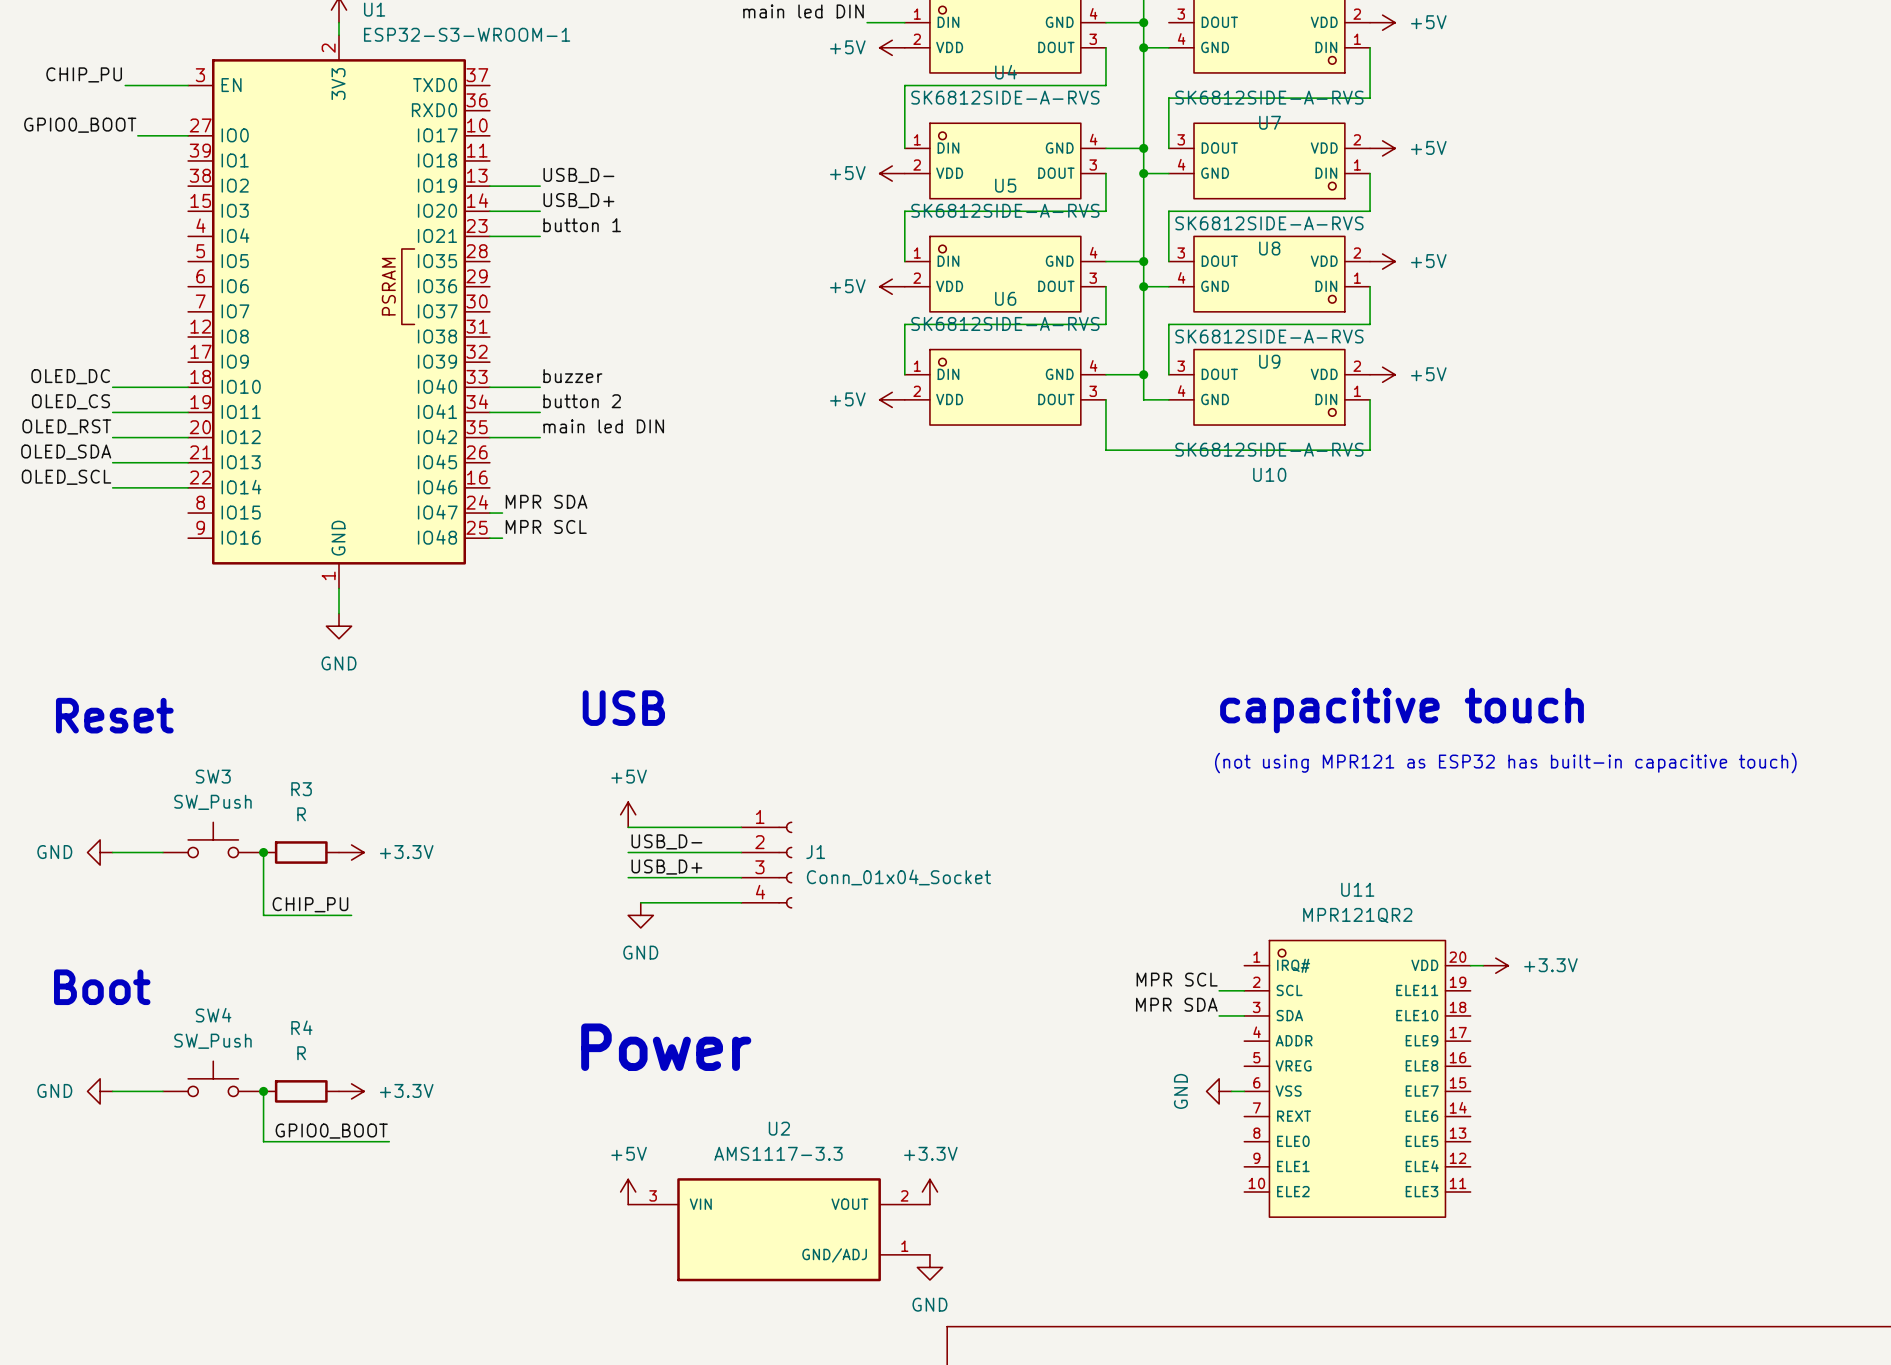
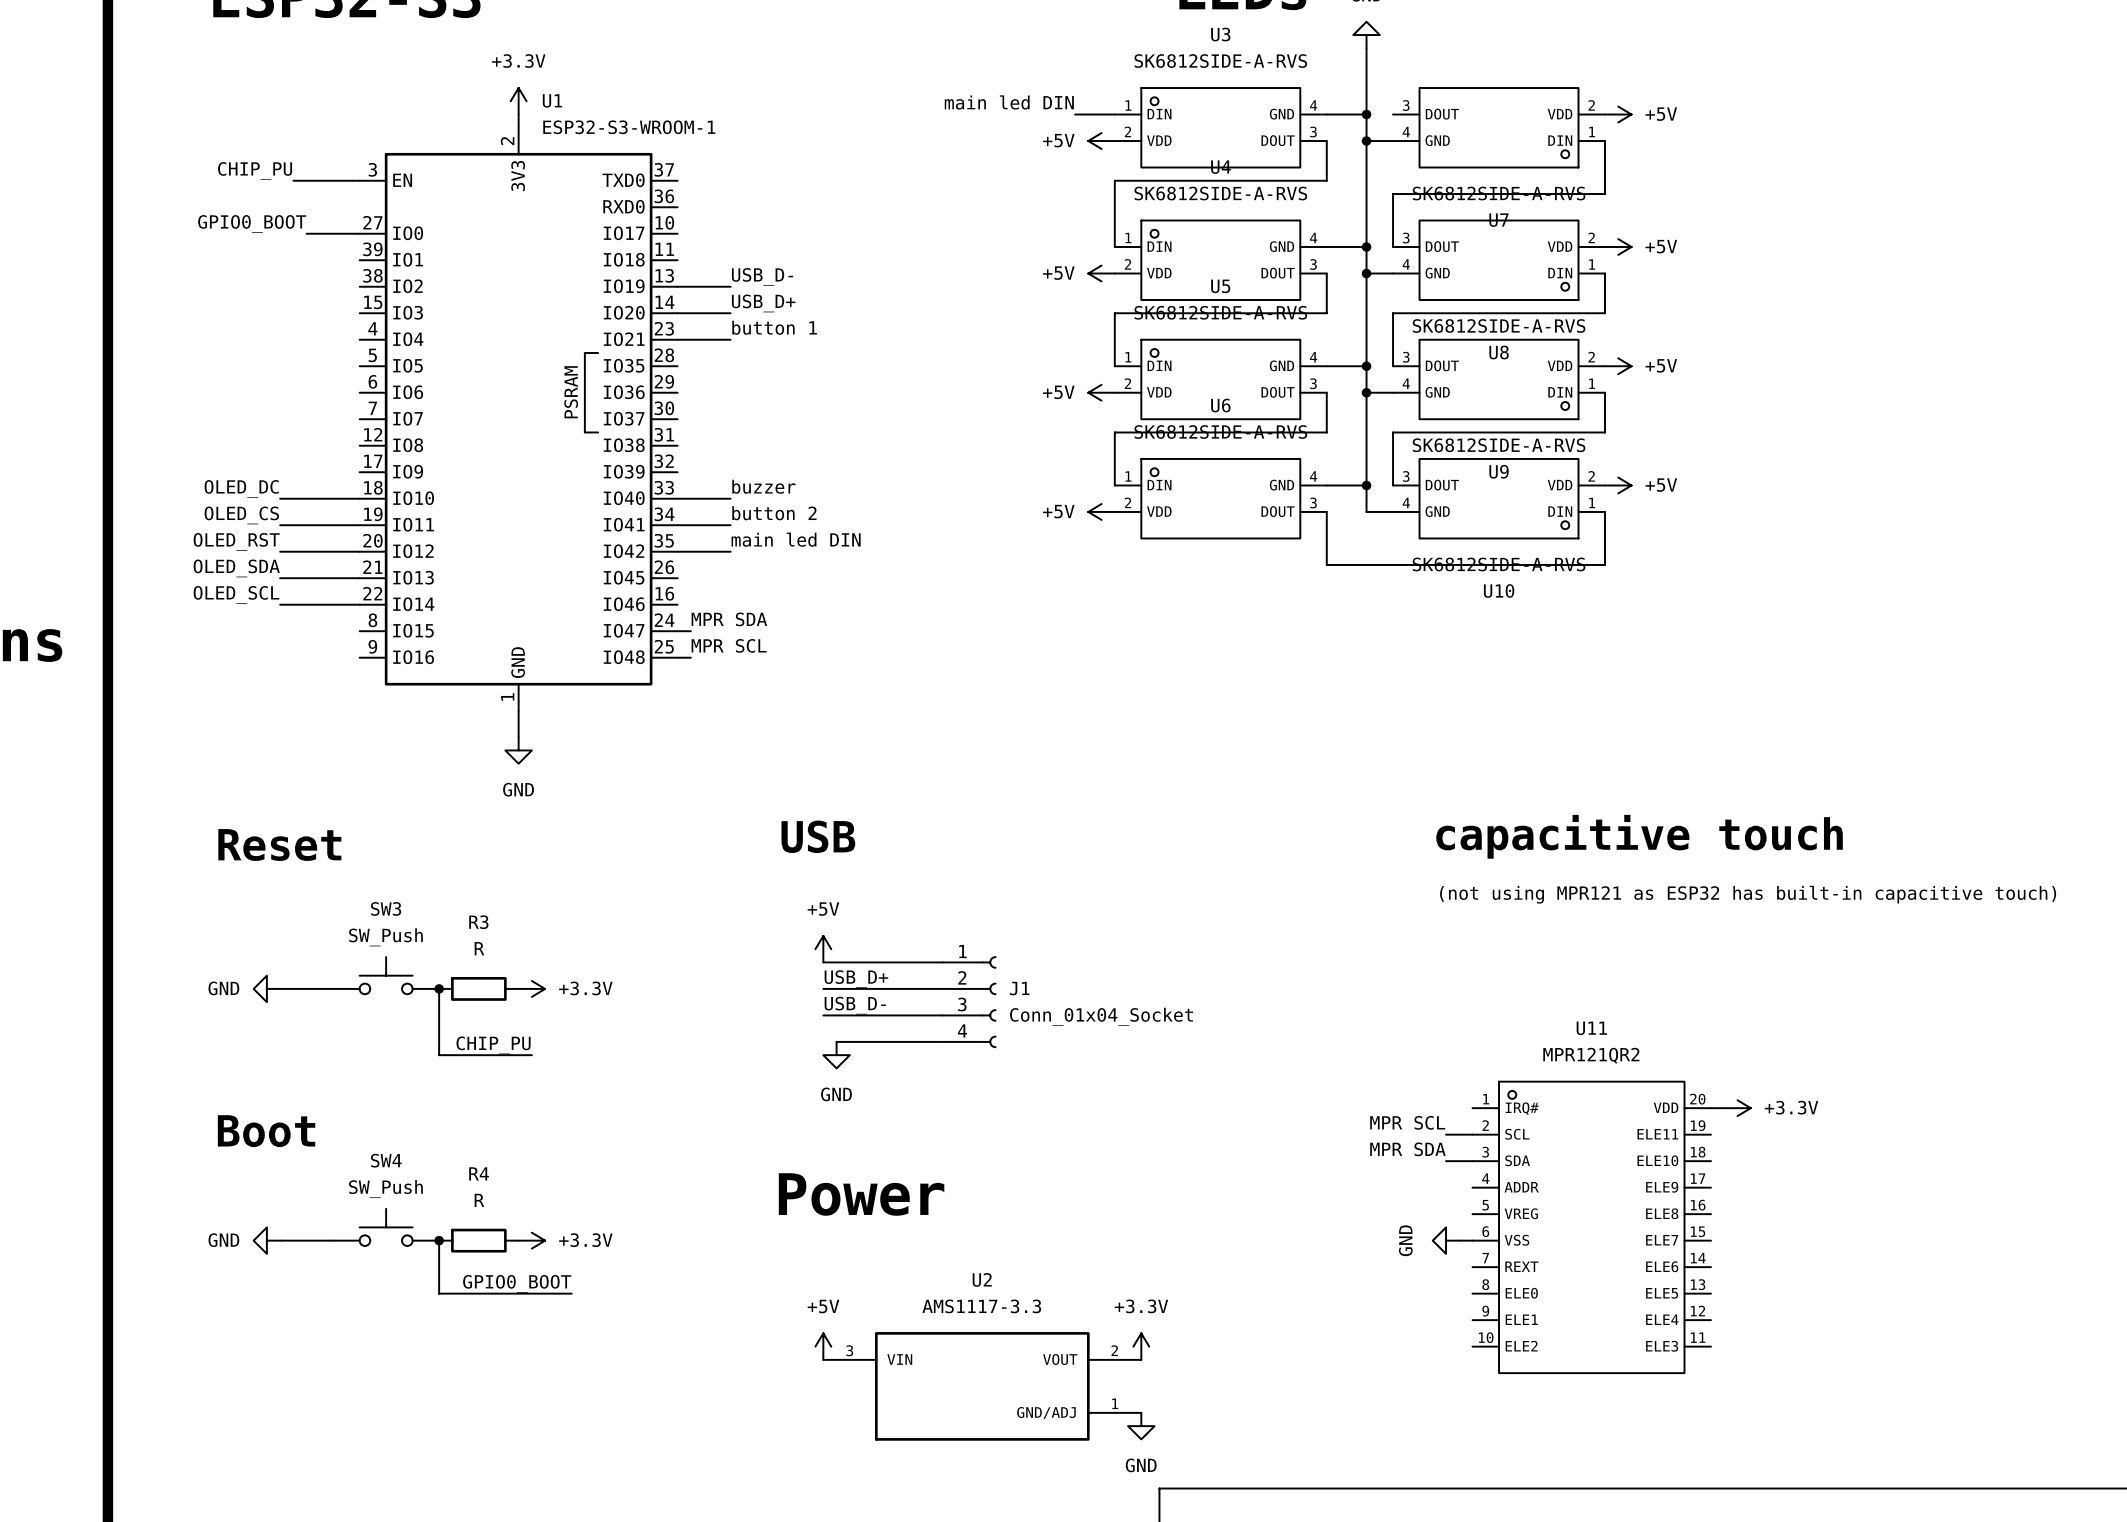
label: USB_D- (666, 841) -> USB_D+ (856, 979)
label: USB_D+ (666, 867) -> USB_D- (855, 1005)

